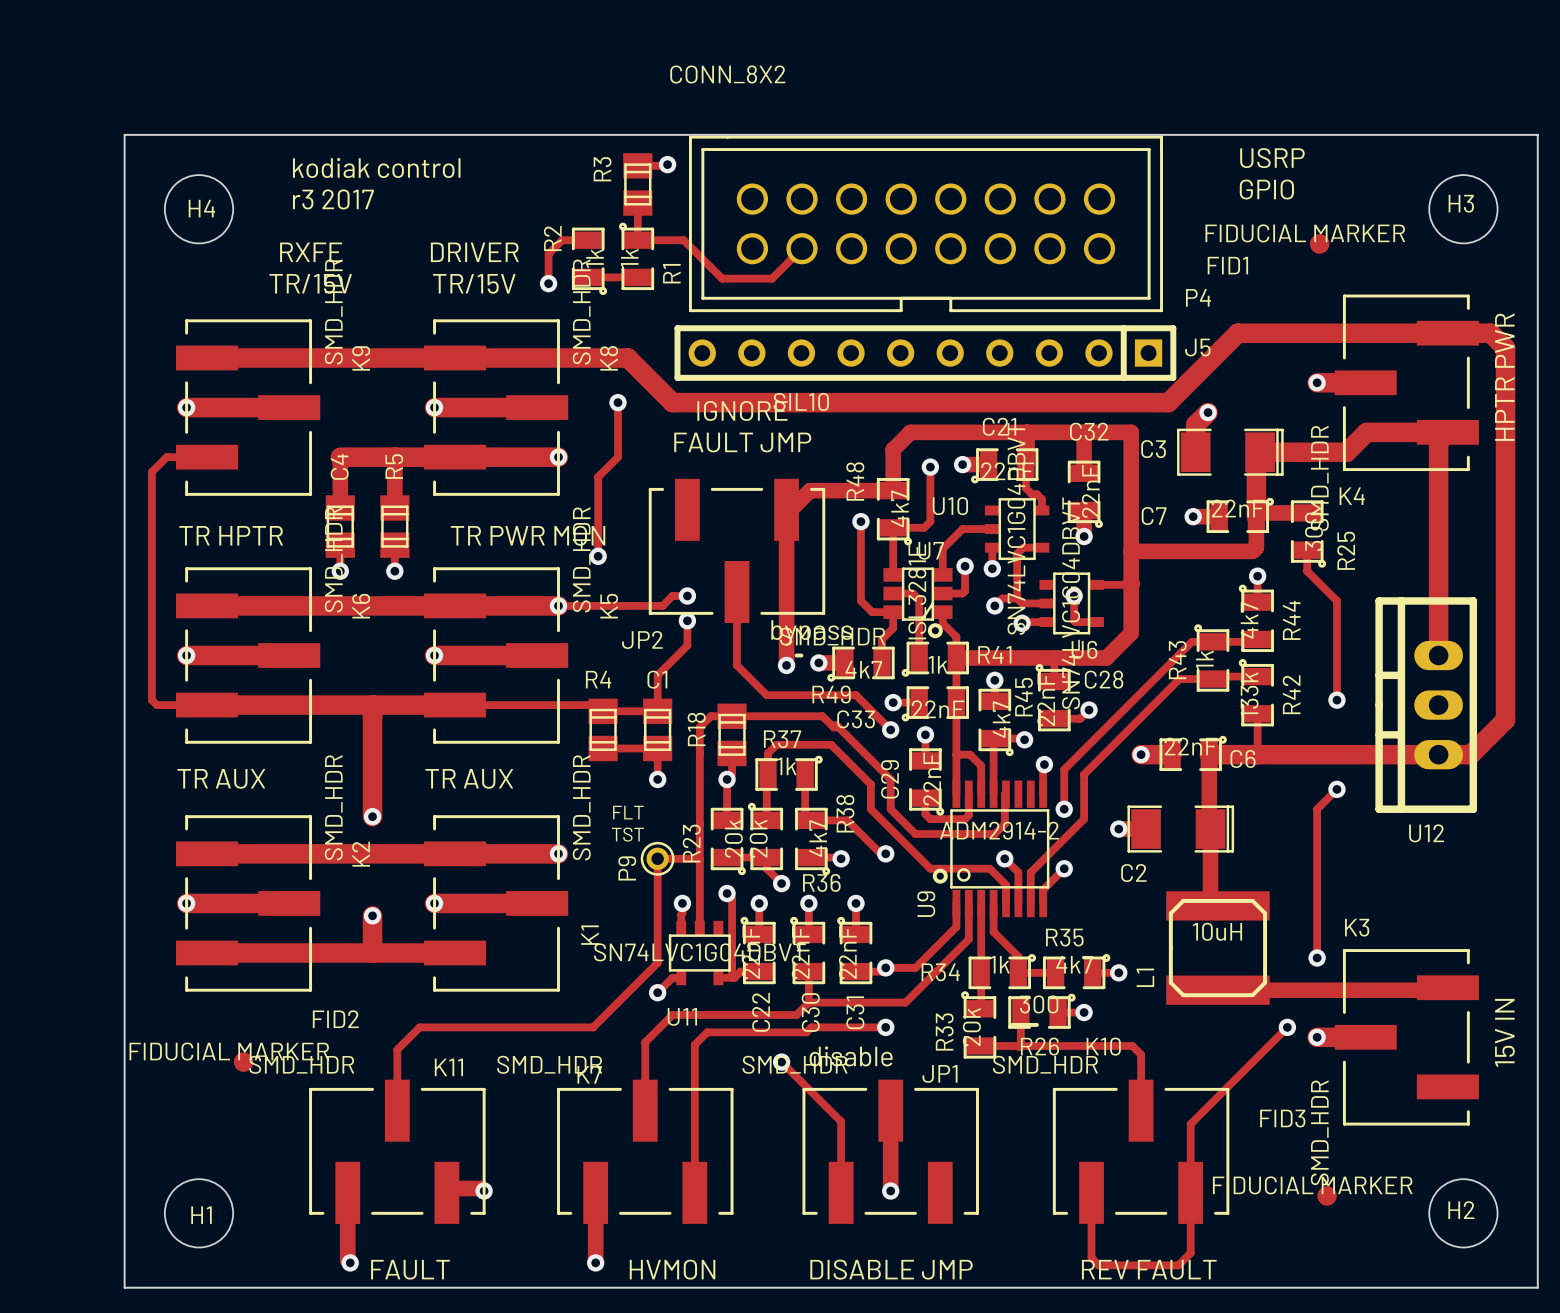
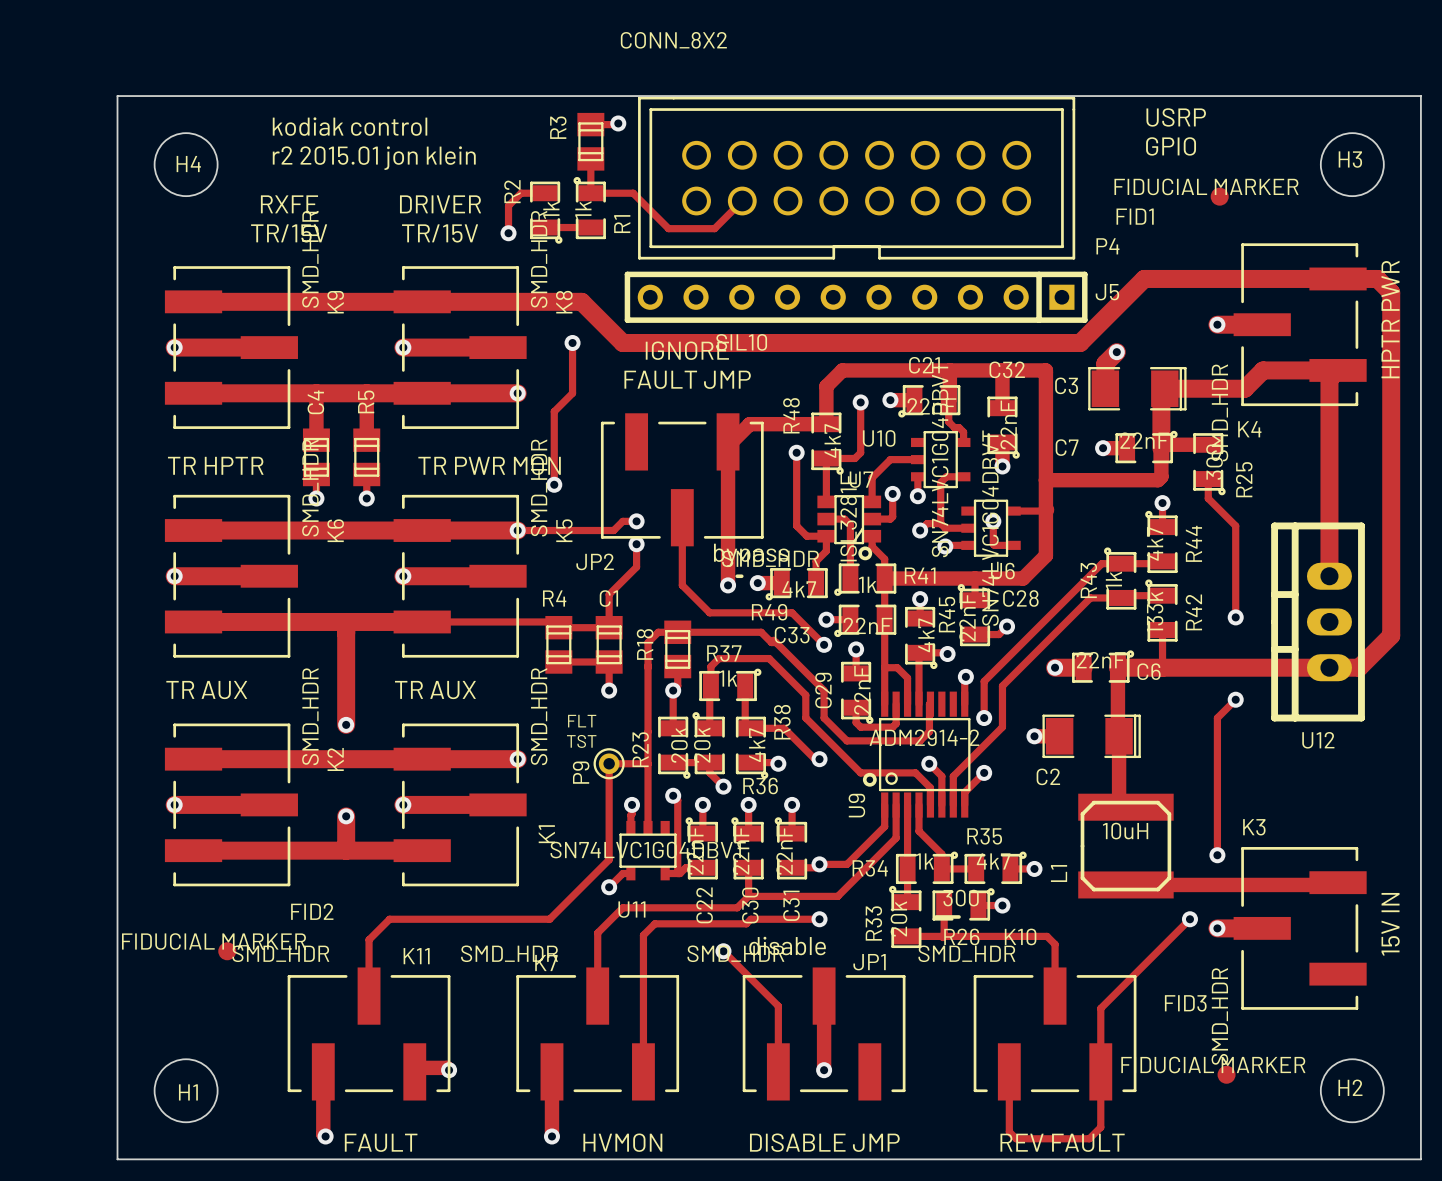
text: r3 2017 (333, 199) -> r2 2015.01 jon klein (374, 158)
track: (207, 457) (166, 457) (151, 472) (151, 700) (156, 705) (207, 705) -> none
track: none -> (197, 393) (316, 393)

